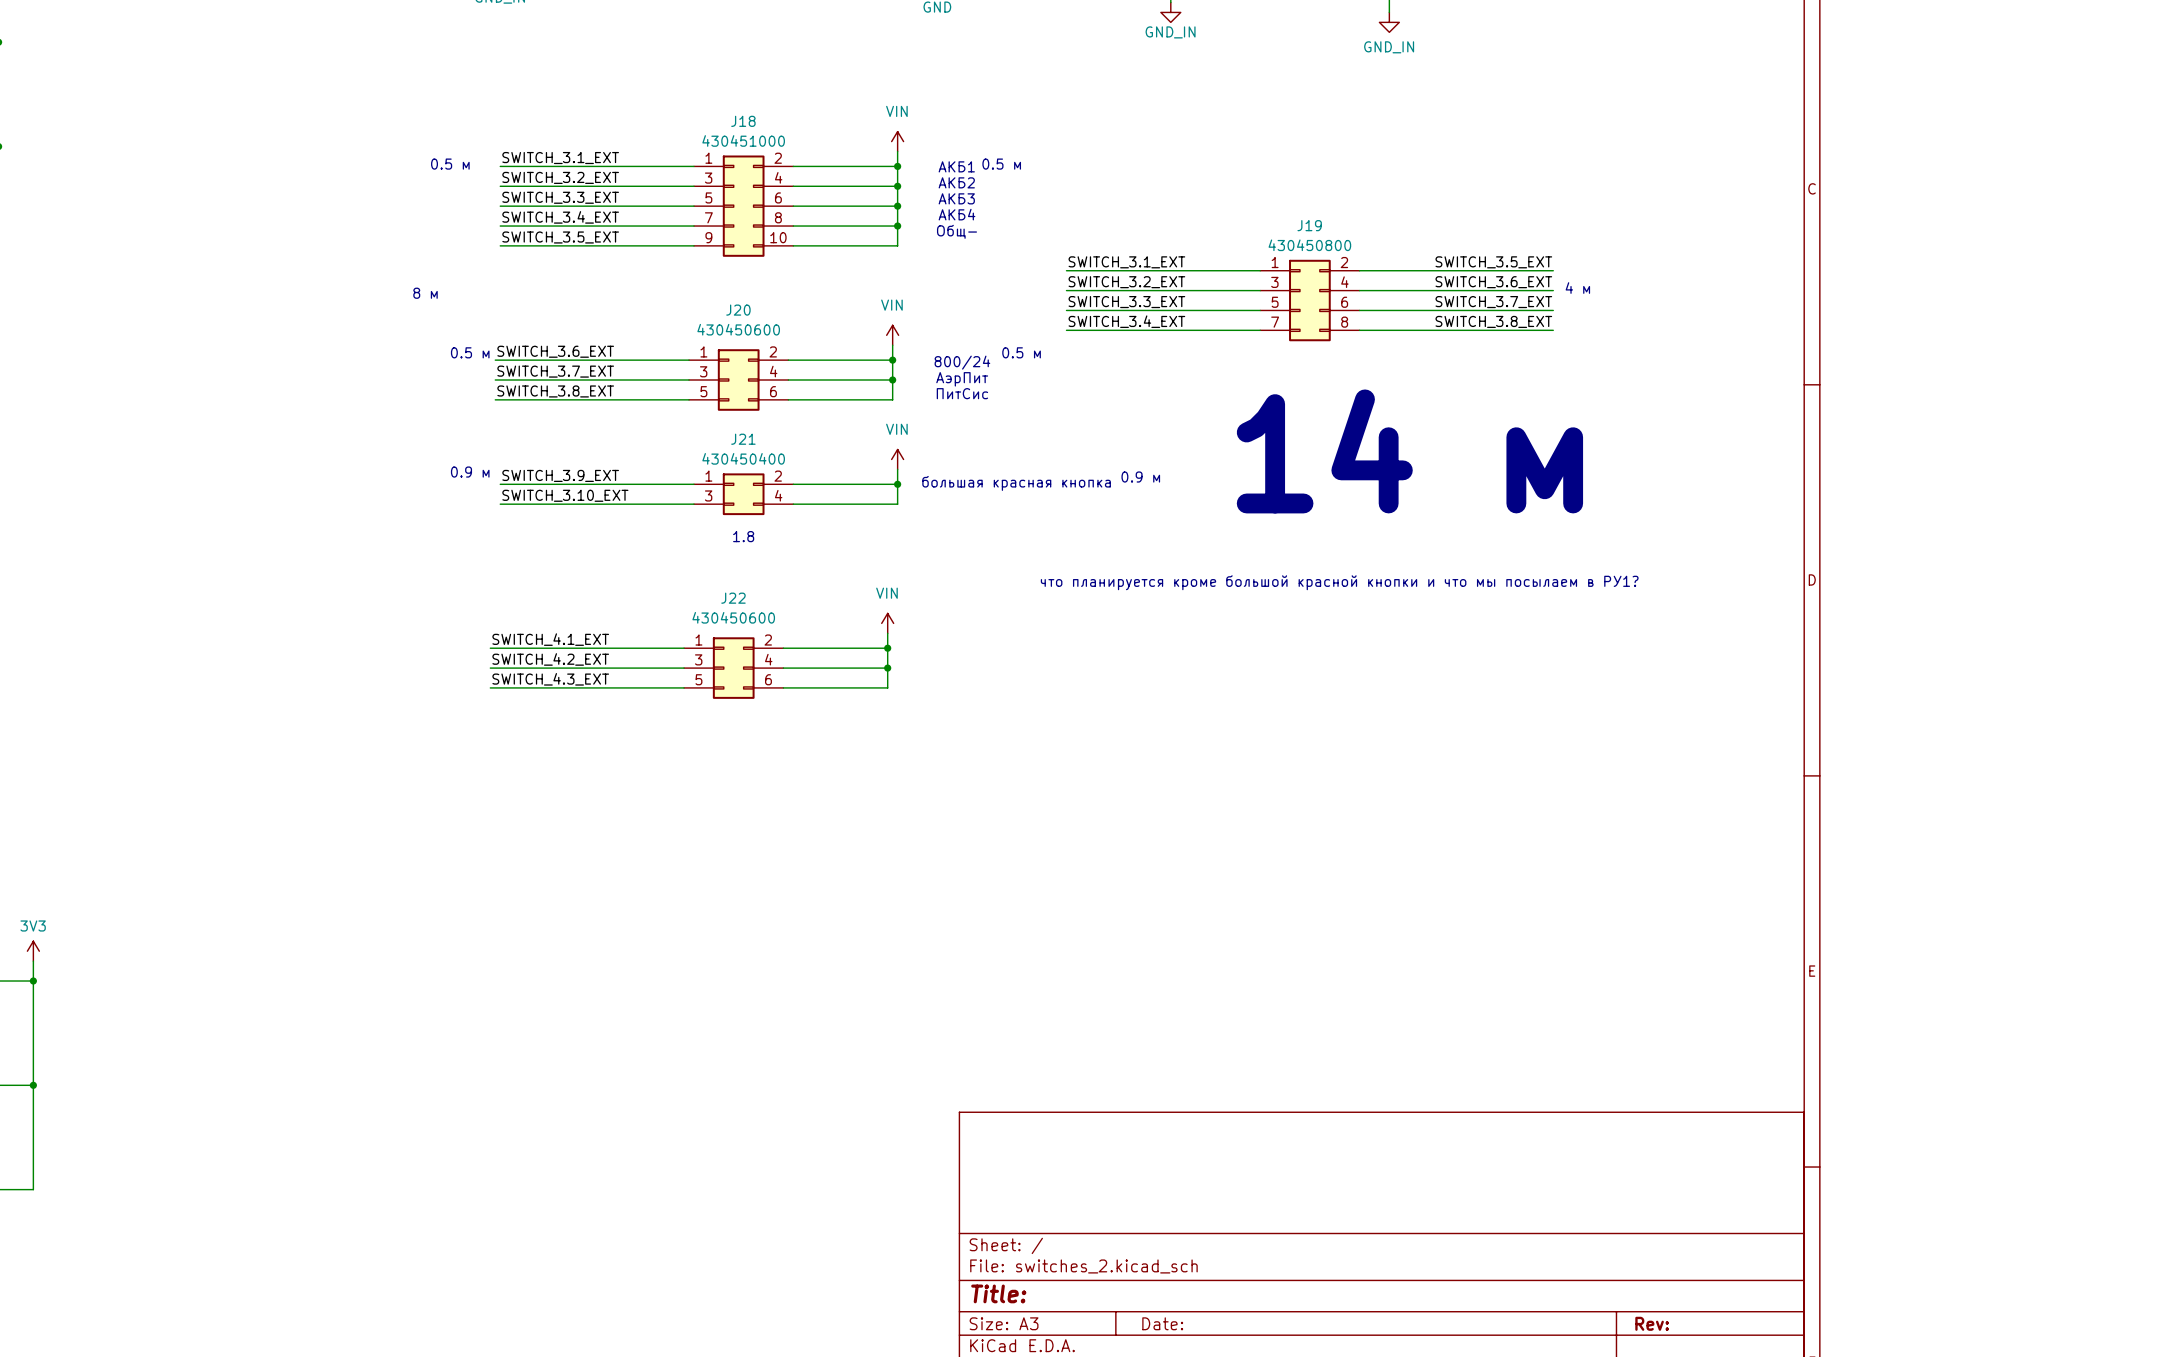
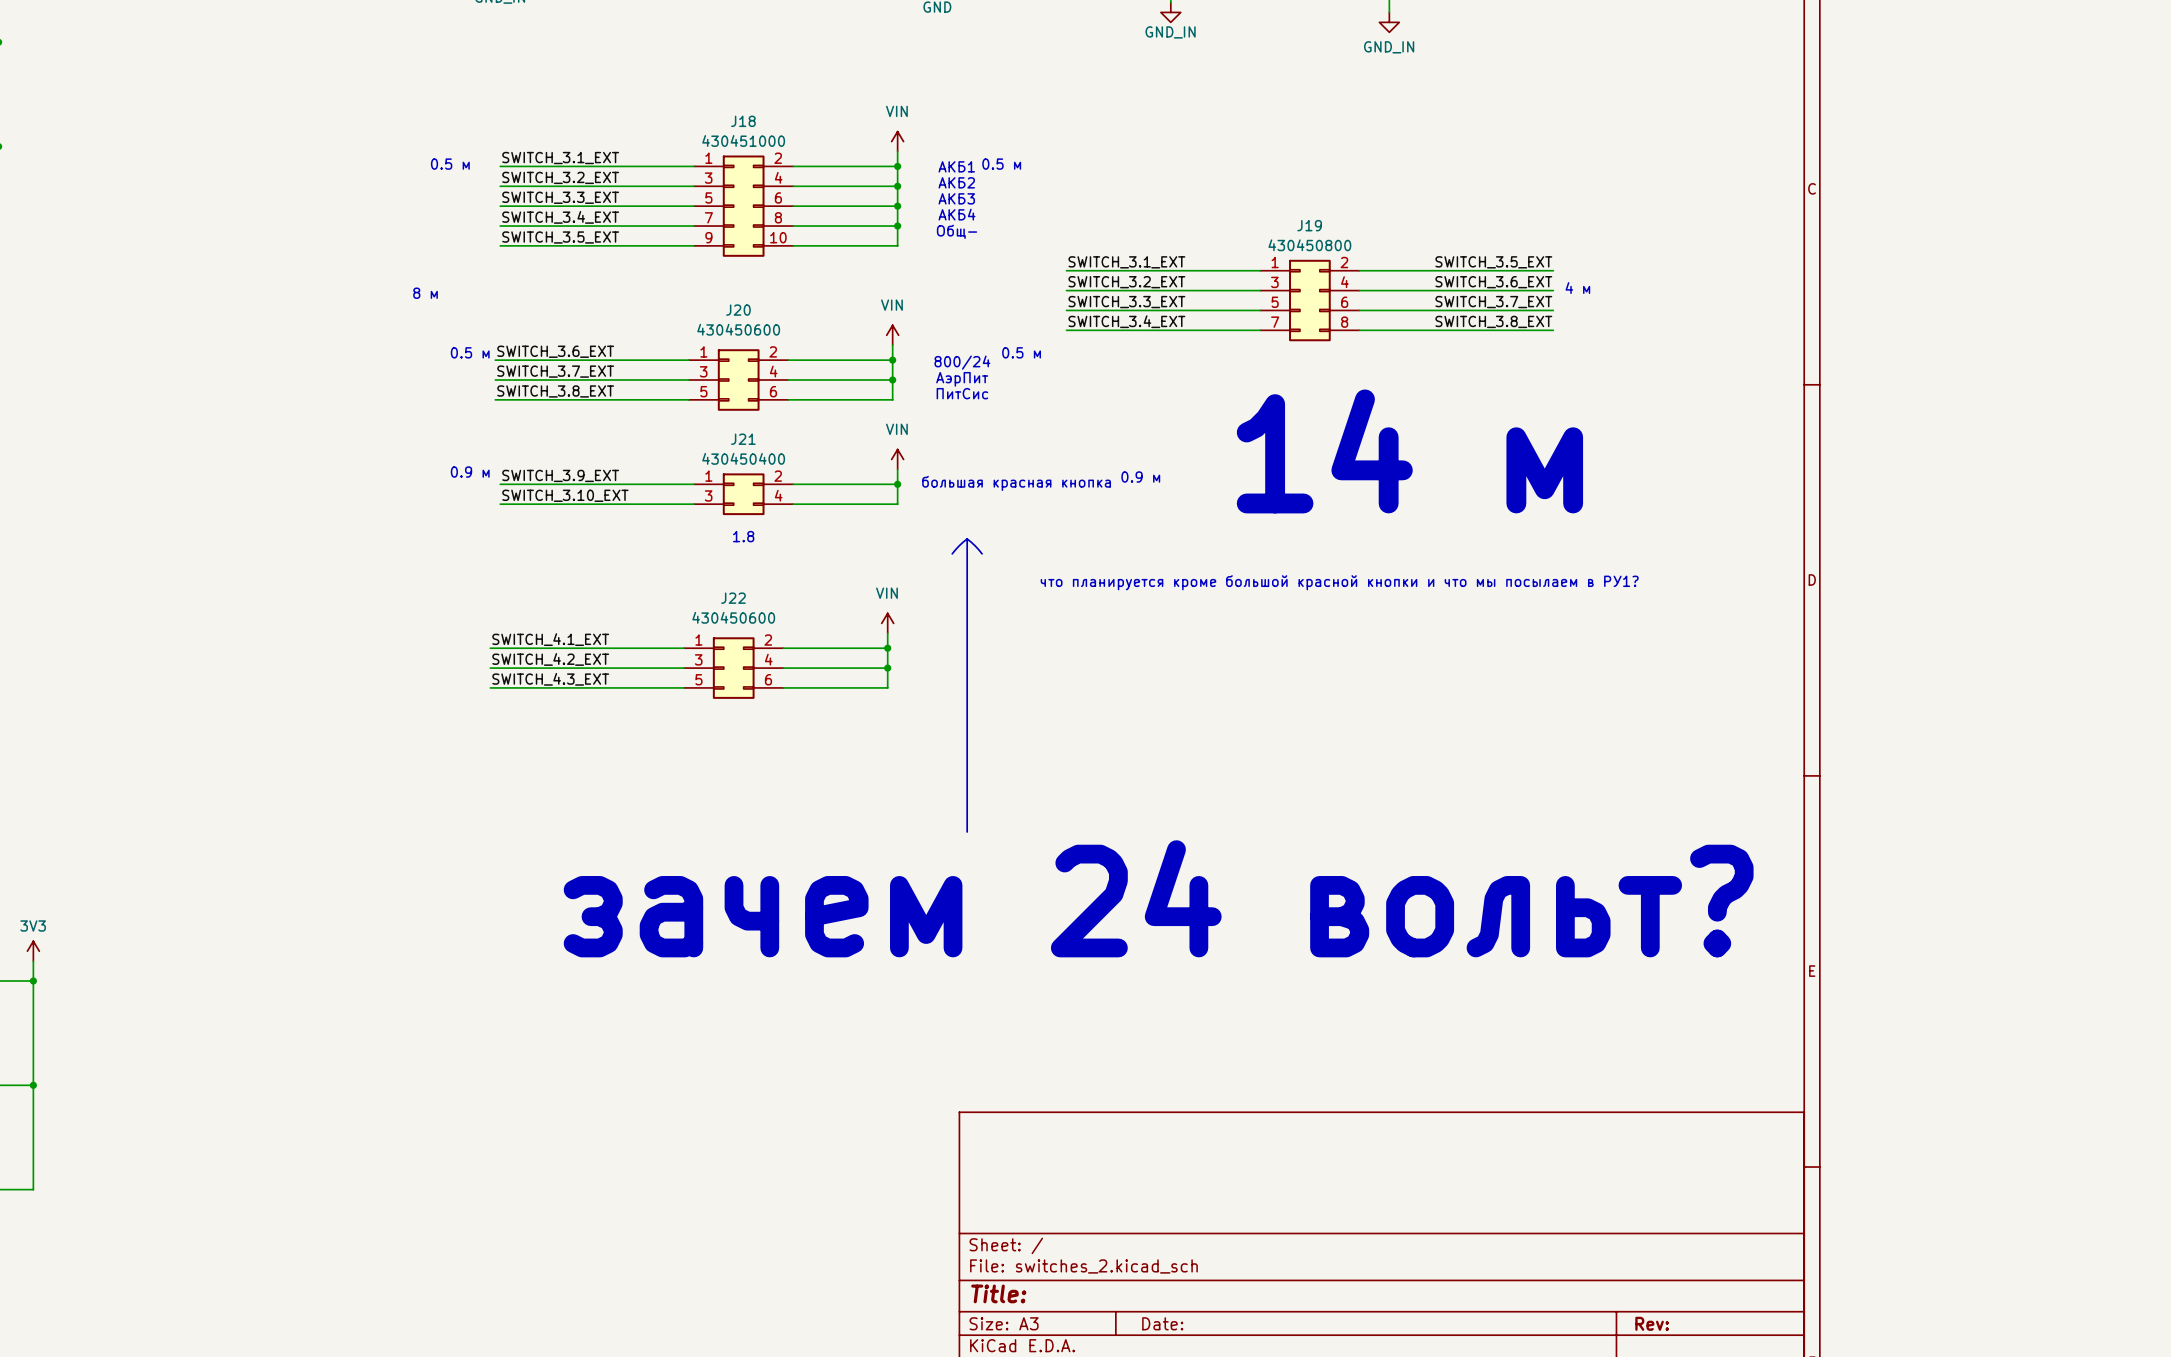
line: none -> (967, 538) (967, 831)
line: none -> (967, 538) (952, 553)
line: none -> (967, 538) (982, 553)
text: none -> зачем 24 вольт? (1158, 898)

